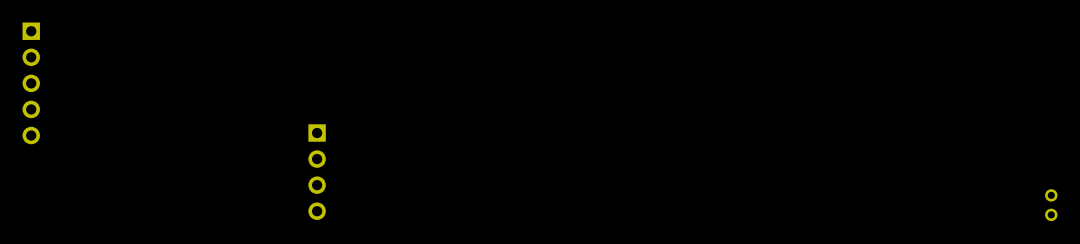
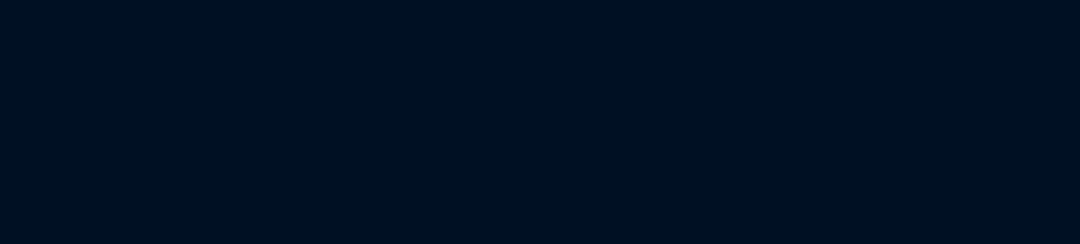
part: (31, 83) -> none
part: (317, 172) -> none
part: (1051, 205) -> none

